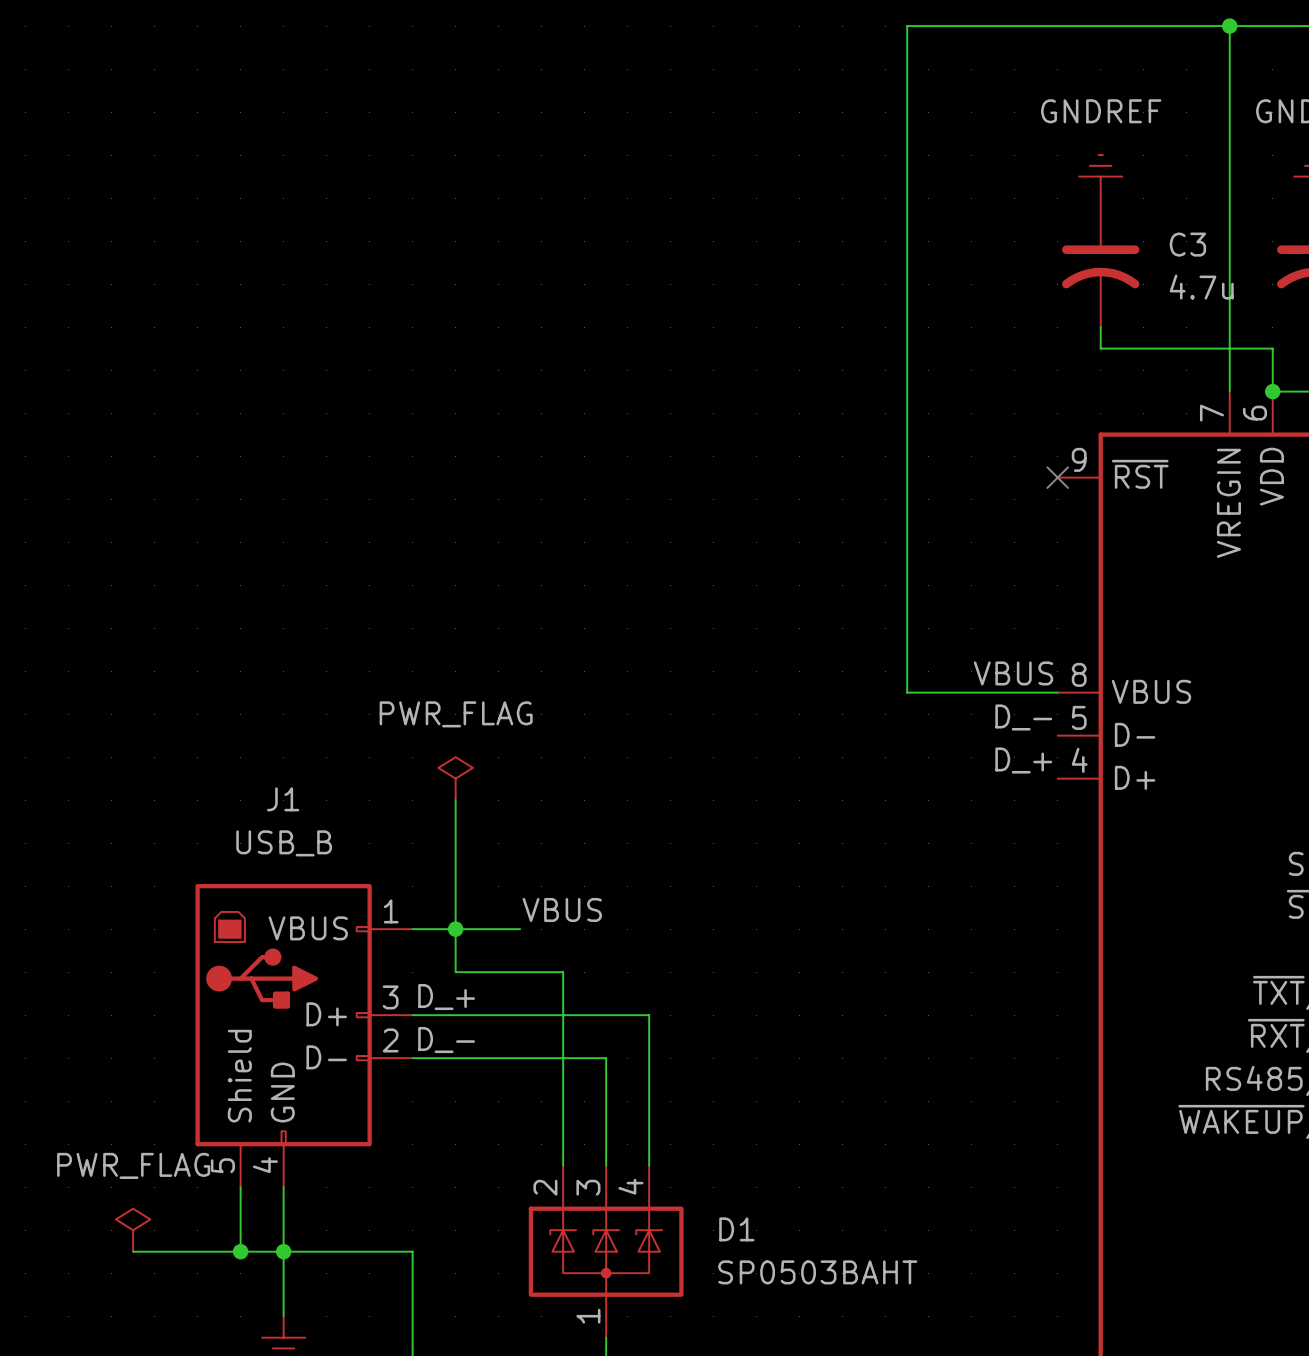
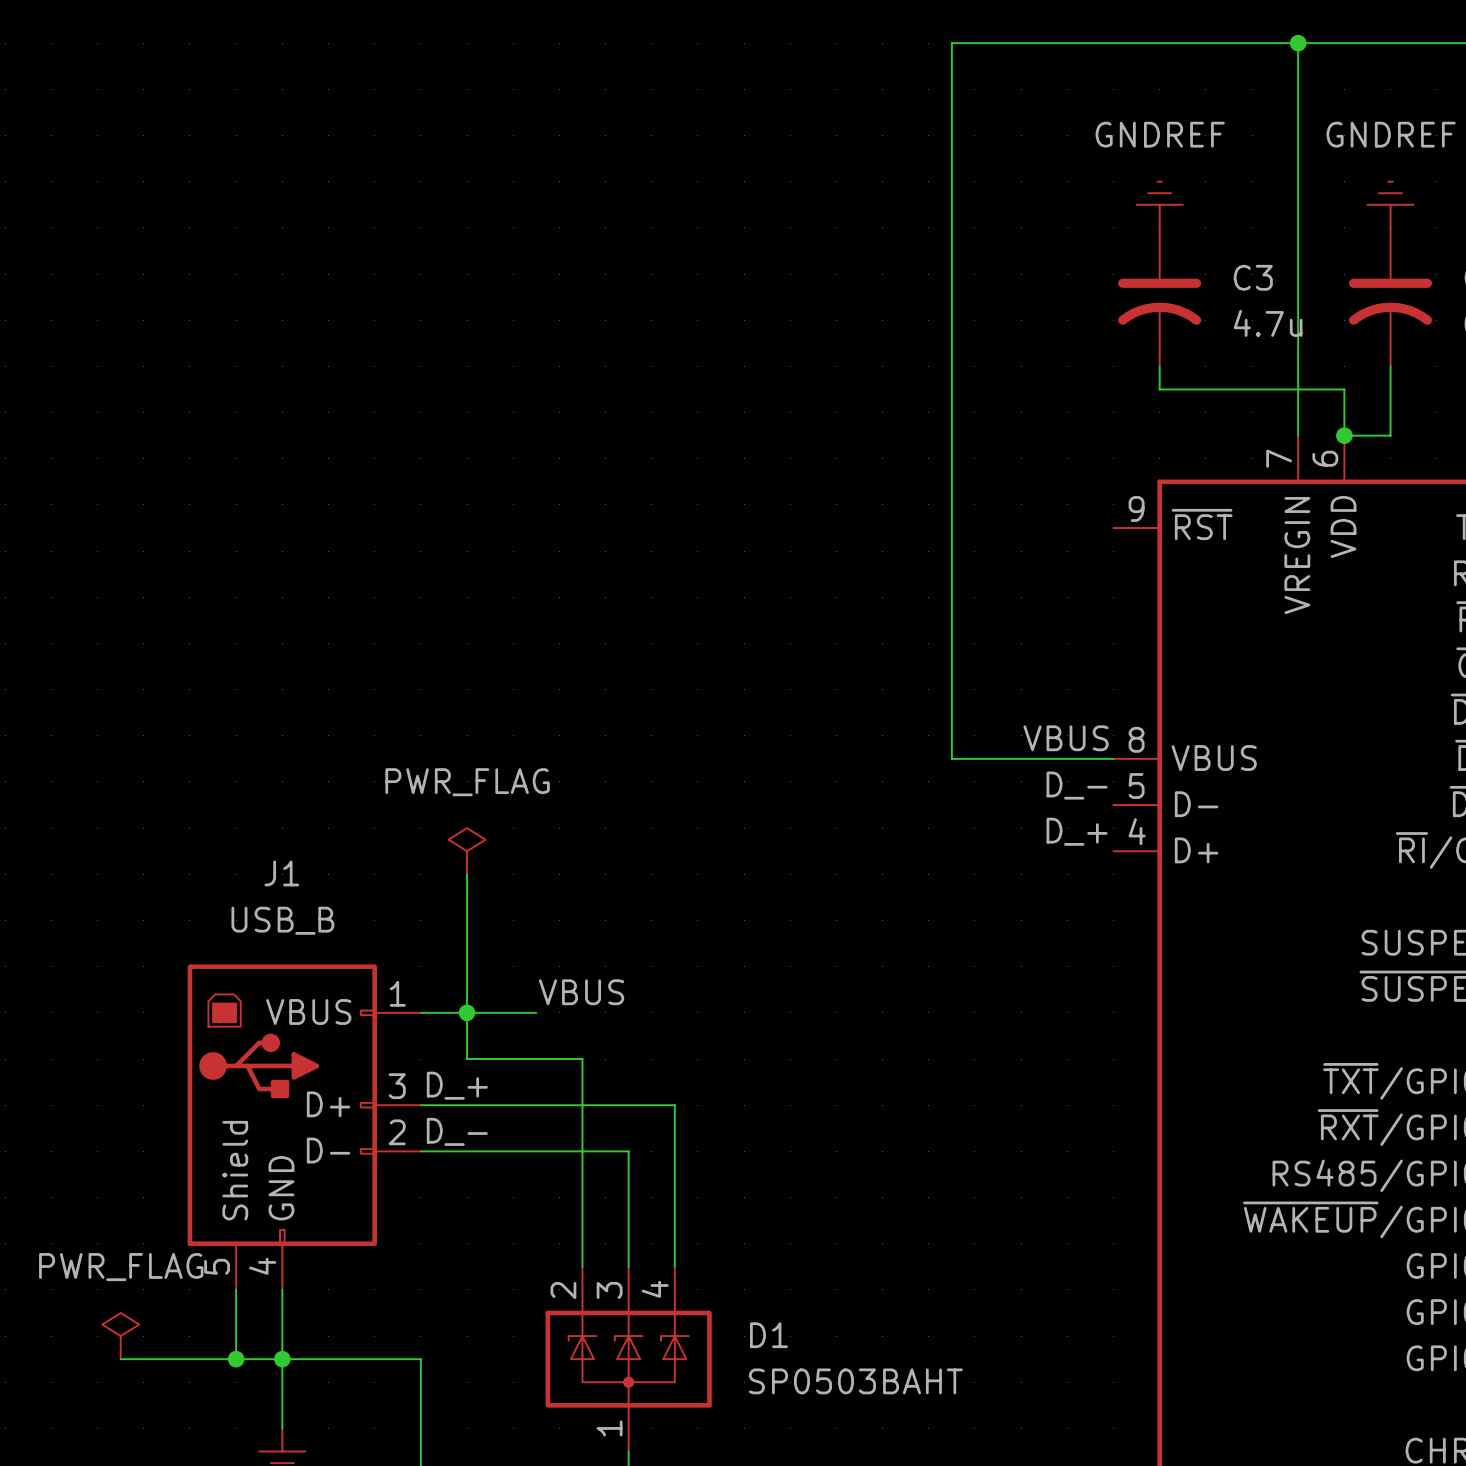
no-connect mark: (1057, 477) -> none

